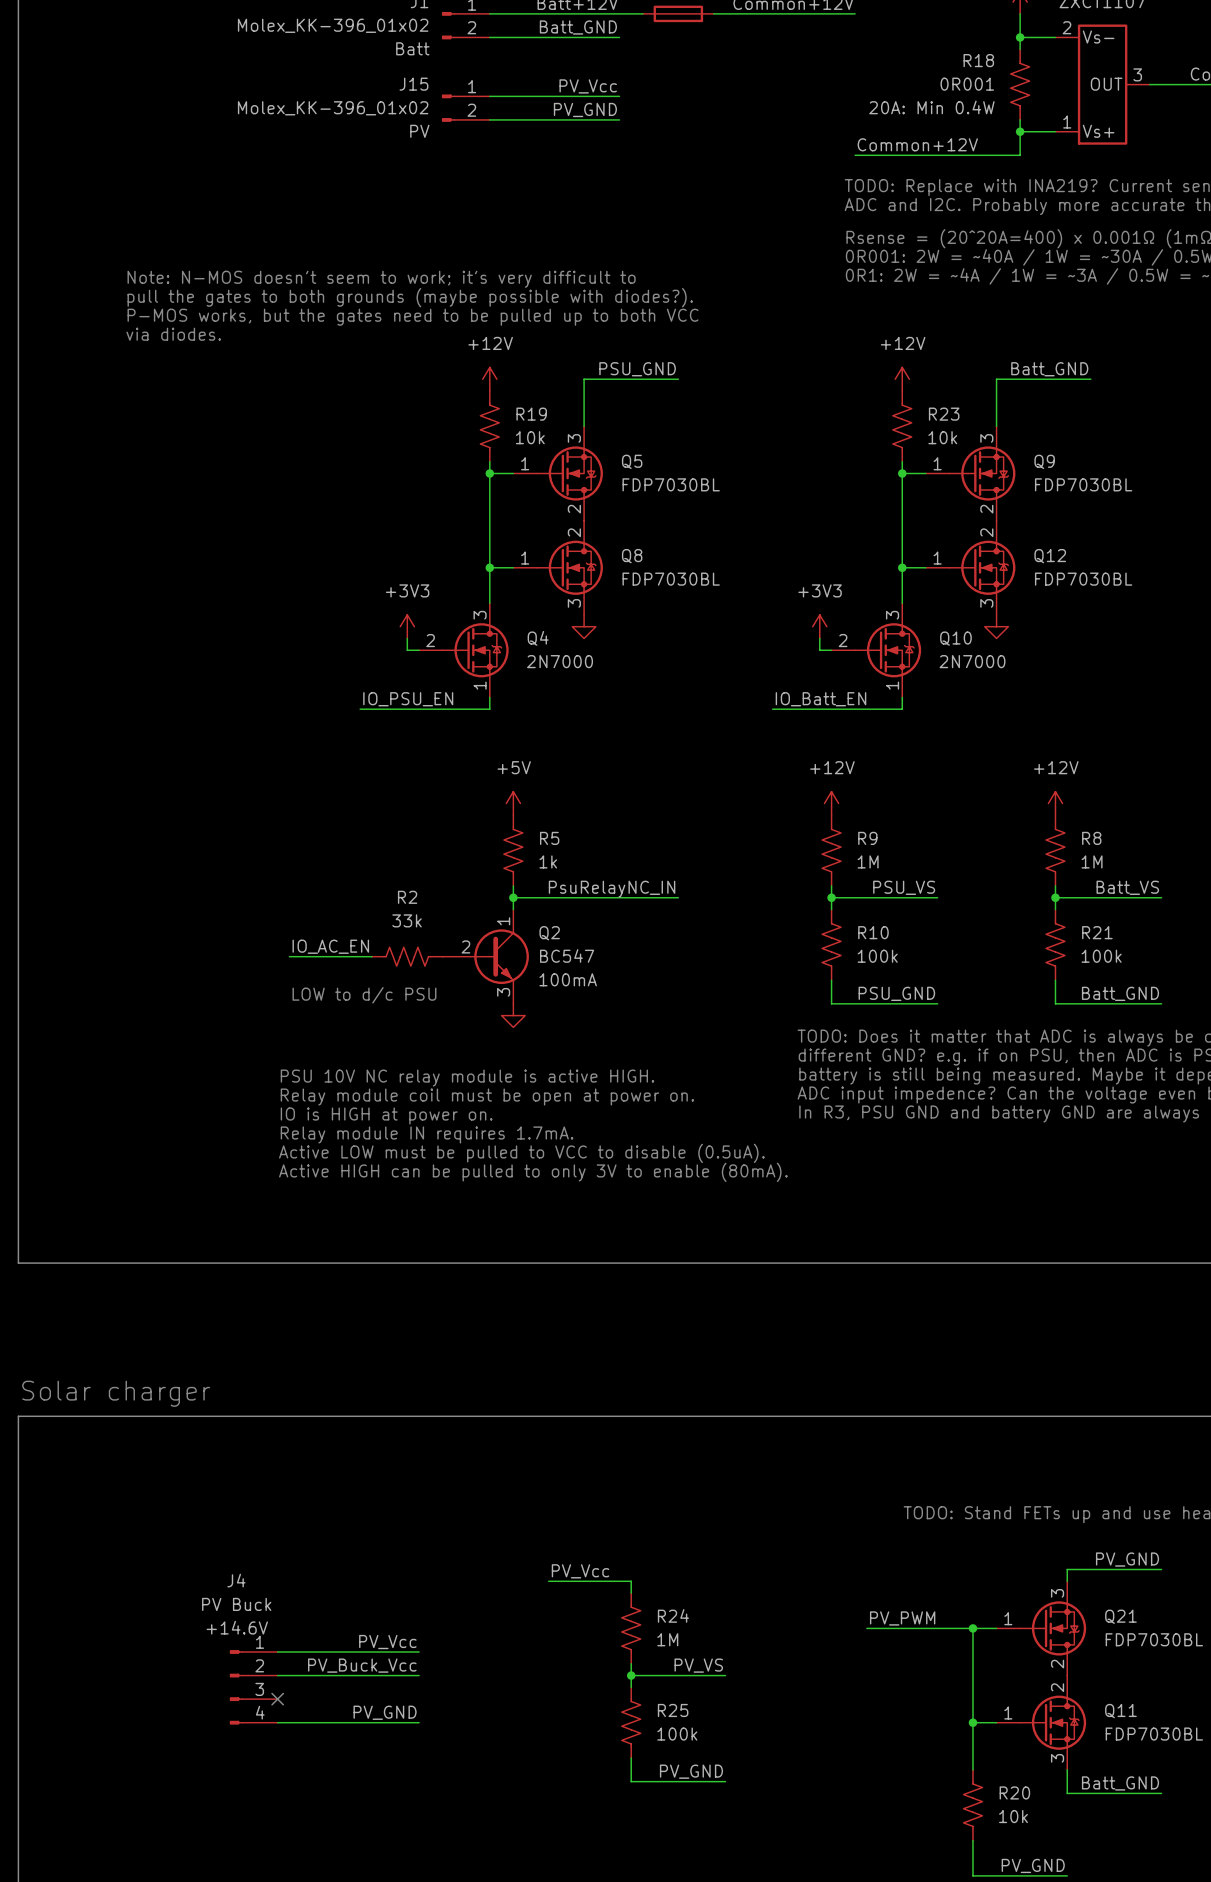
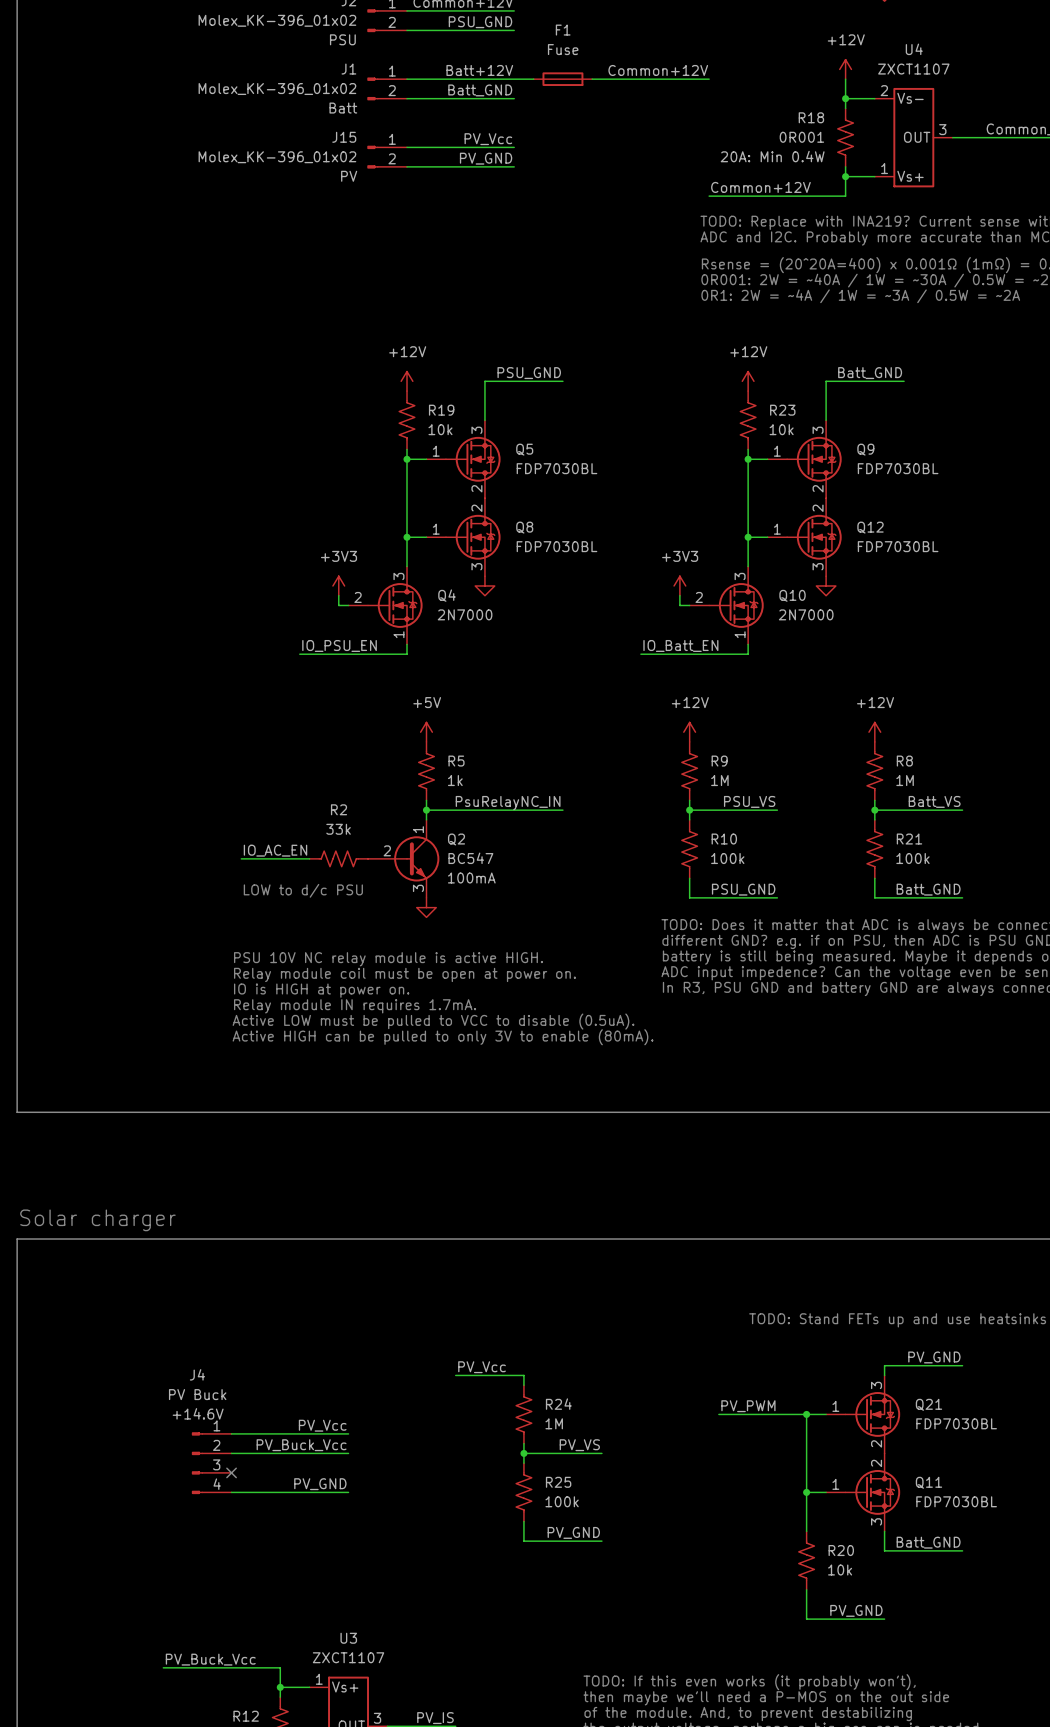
text: Note: N-MOS doesn't seem to work; it's very difficult to (381, 279) -> none
text: pull the gates to both grounds (maybe possible with diodes?). (410, 297) -> none
text: P-MOS works, but the gates need to be pulled up to both VCC (413, 317) -> none
text: via diodes. (173, 334) -> none

